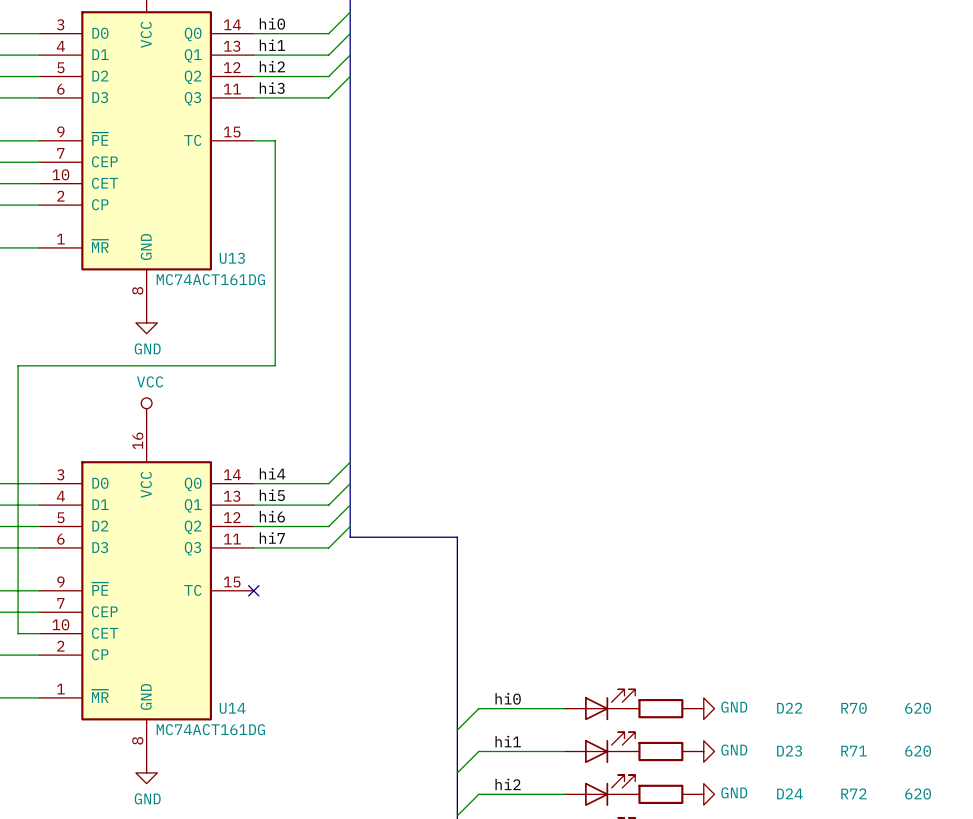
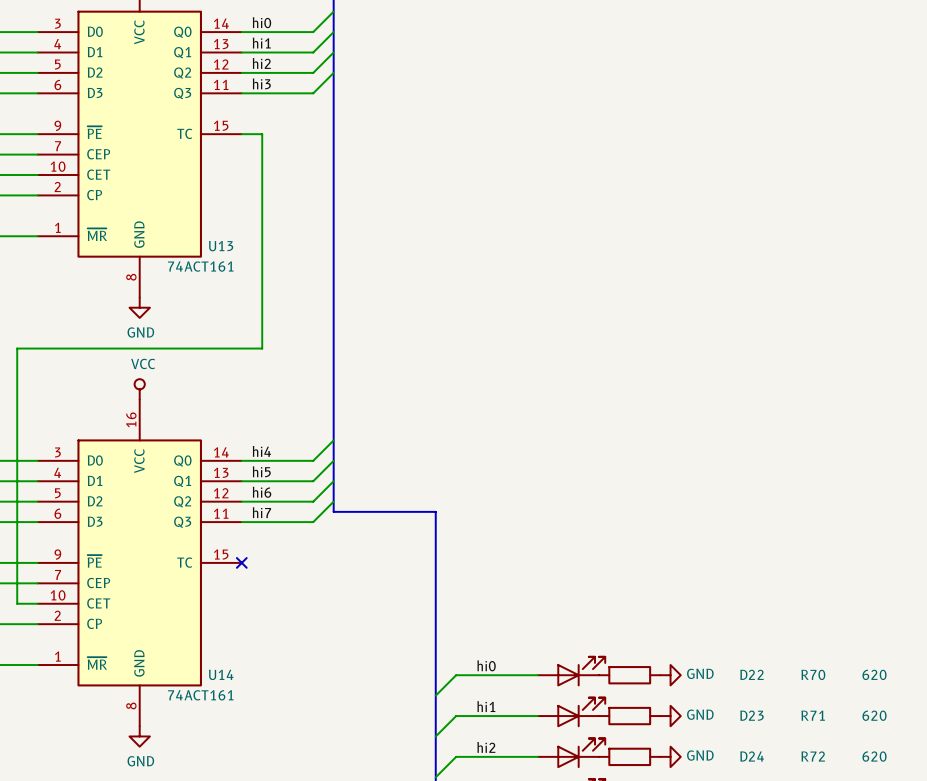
U13 value: MC74ACT161DG (210, 279) -> 74ACT161 (200, 266)
U14 value: MC74ACT161DG (210, 729) -> 74ACT161 (200, 695)

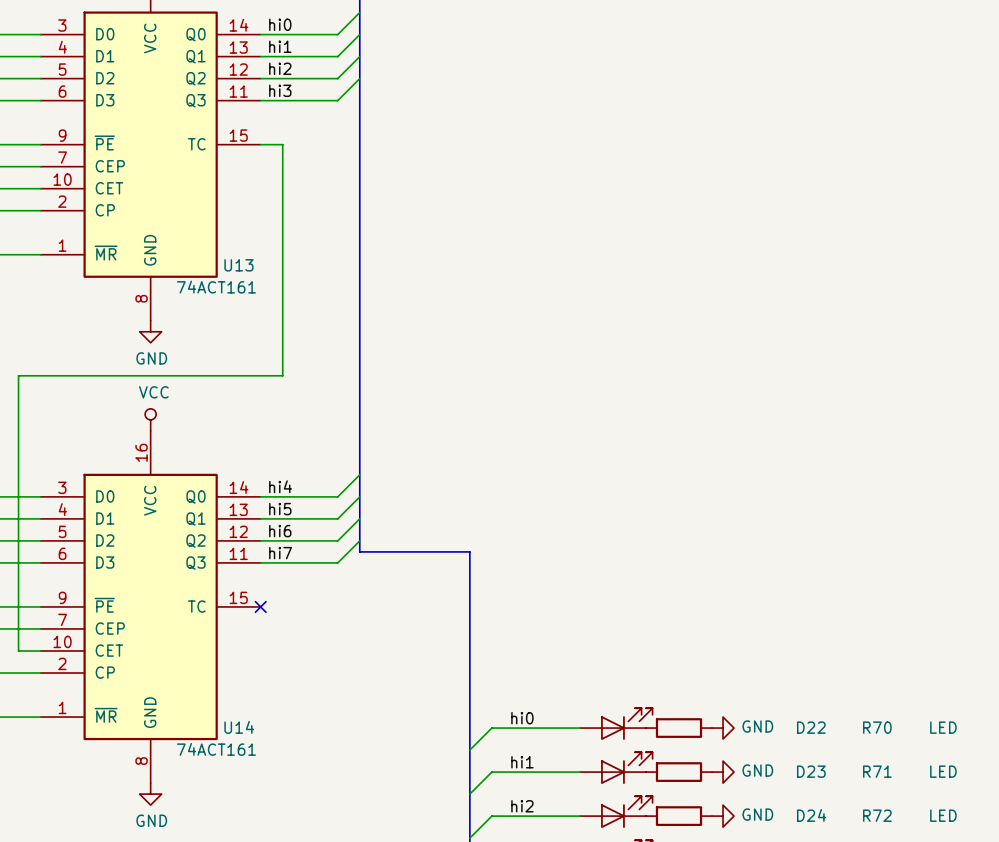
R70 value: 620 (874, 674) -> LED (943, 727)
R71 value: 620 (874, 715) -> LED (943, 771)
R72 value: 620 (874, 756) -> LED (943, 815)

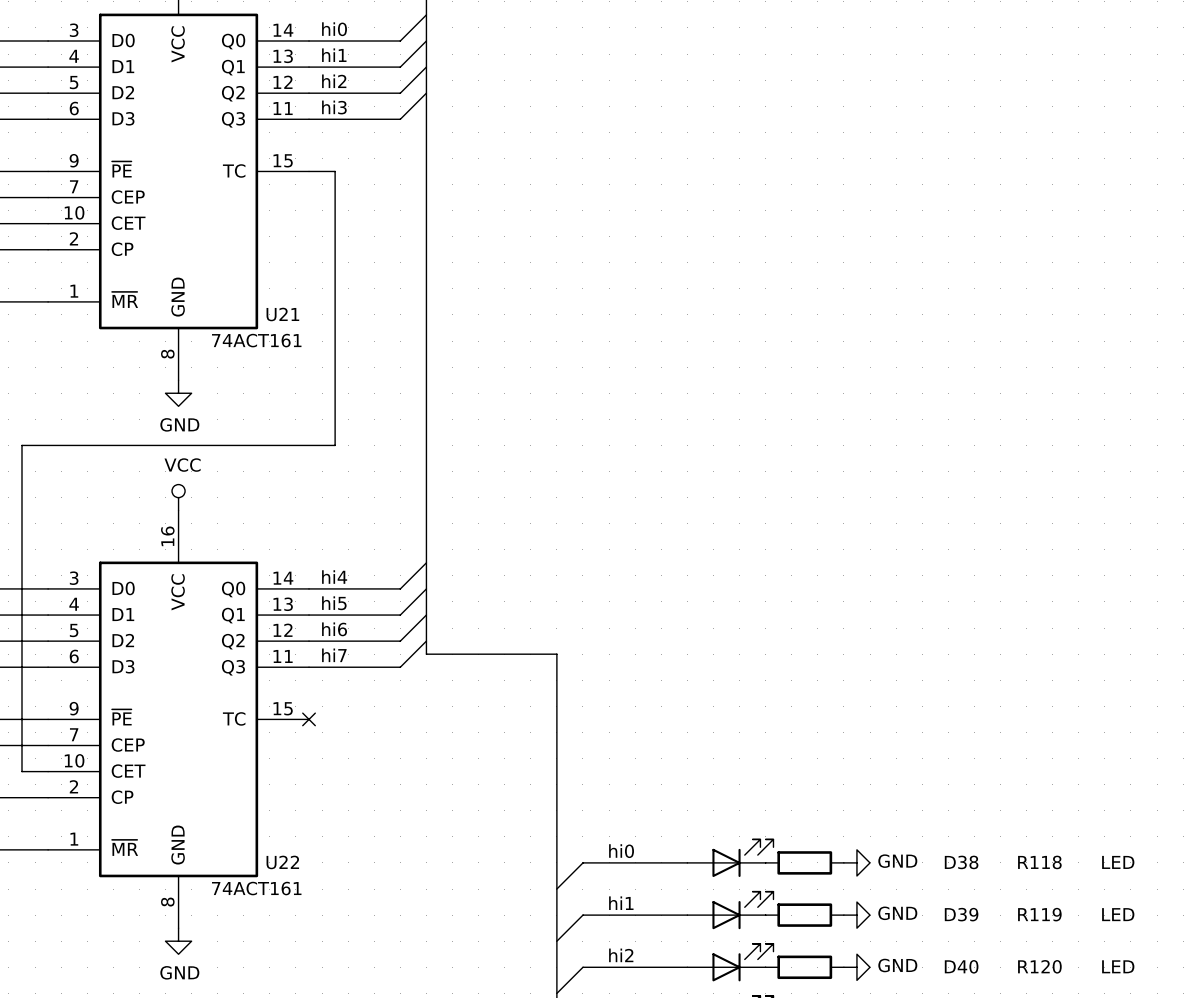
U13 name: U13 (238, 265) -> U21 (282, 314)
U14 name: U14 (239, 727) -> U22 (282, 862)
D22 name: D22 (811, 727) -> D38 (961, 862)
R70 name: R70 (877, 727) -> R118 (1039, 862)
D23 name: D23 (811, 771) -> D39 (961, 914)
R71 name: R71 (877, 771) -> R119 (1039, 914)
D24 name: D24 (811, 815) -> D40 (961, 966)
R72 name: R72 (877, 815) -> R120 (1039, 966)

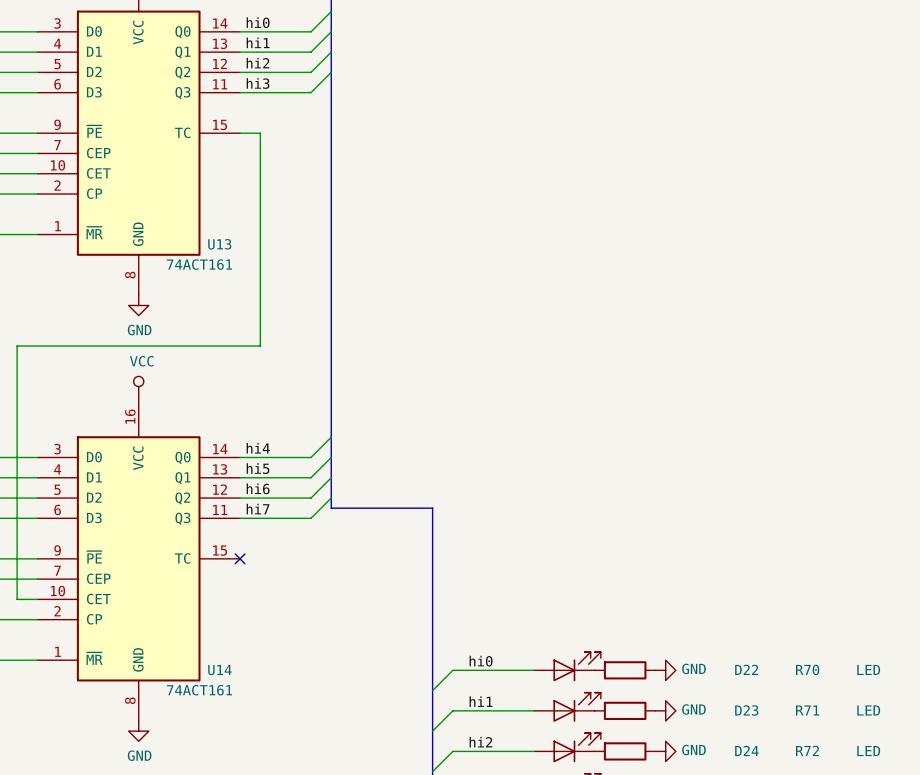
U21 name: U21 (282, 314) -> U13 (219, 244)
U22 name: U22 (282, 862) -> U14 (219, 670)
D38 name: D38 (961, 862) -> D22 (746, 669)
R118 name: R118 (1039, 862) -> R70 (807, 669)
D39 name: D39 (961, 914) -> D23 (746, 710)
R119 name: R119 (1039, 914) -> R71 (807, 710)
D40 name: D40 (961, 966) -> D24 (746, 750)
R120 name: R120 (1039, 966) -> R72 (807, 750)

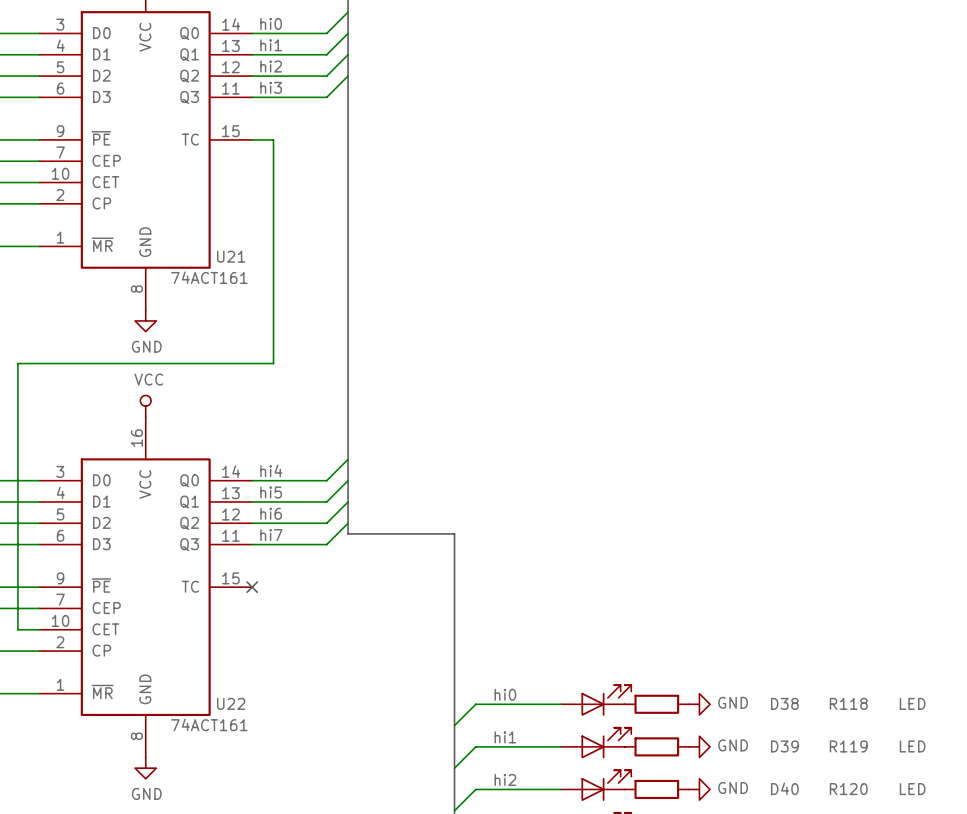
U13 name: U13 (219, 244) -> U21 (231, 256)
D22 name: D22 (746, 669) -> D38 (784, 703)
R70 name: R70 (807, 669) -> R118 (848, 703)
U14 name: U14 (219, 670) -> U22 (231, 703)
D23 name: D23 (746, 710) -> D39 (784, 746)
R71 name: R71 (807, 710) -> R119 (848, 746)
D24 name: D24 (746, 750) -> D40 (784, 788)
R72 name: R72 (807, 750) -> R120 (848, 789)

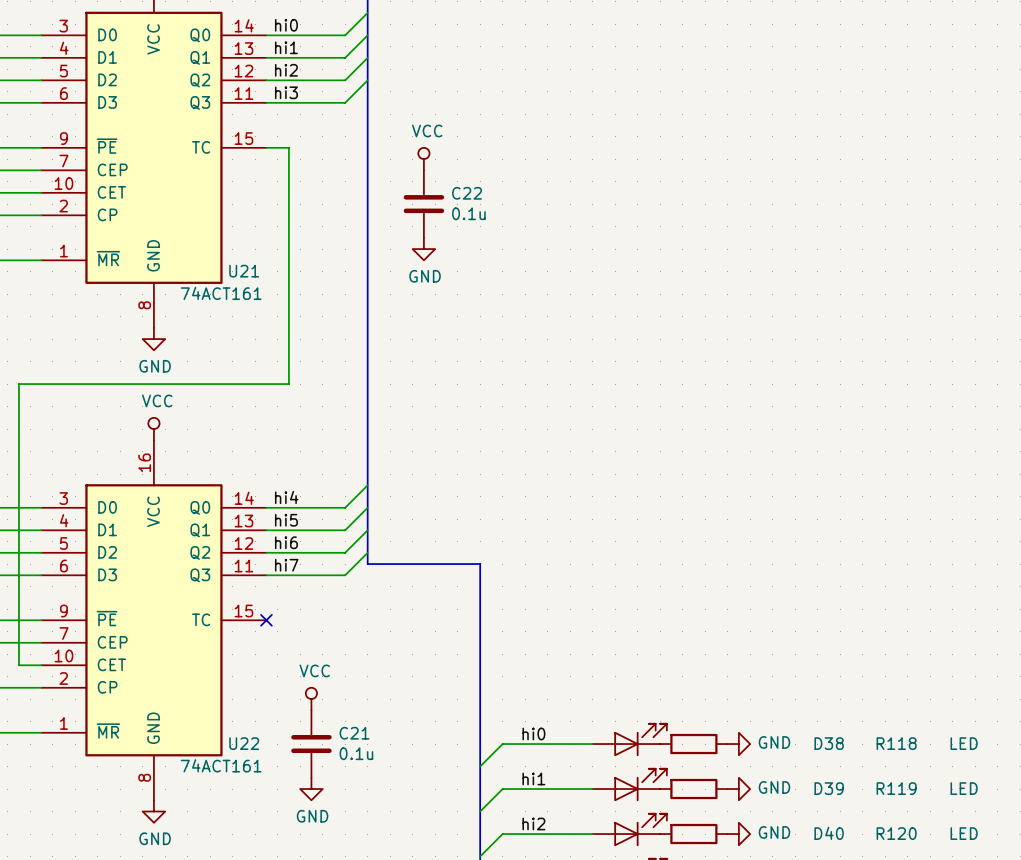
power symbol: none -> VCC (423, 159)
C22: none -> 0.1u (423, 204)
power symbol: none -> GND (423, 249)
power symbol: none -> VCC (311, 699)
C21: none -> 0.1u (311, 744)
power symbol: none -> GND (311, 789)

